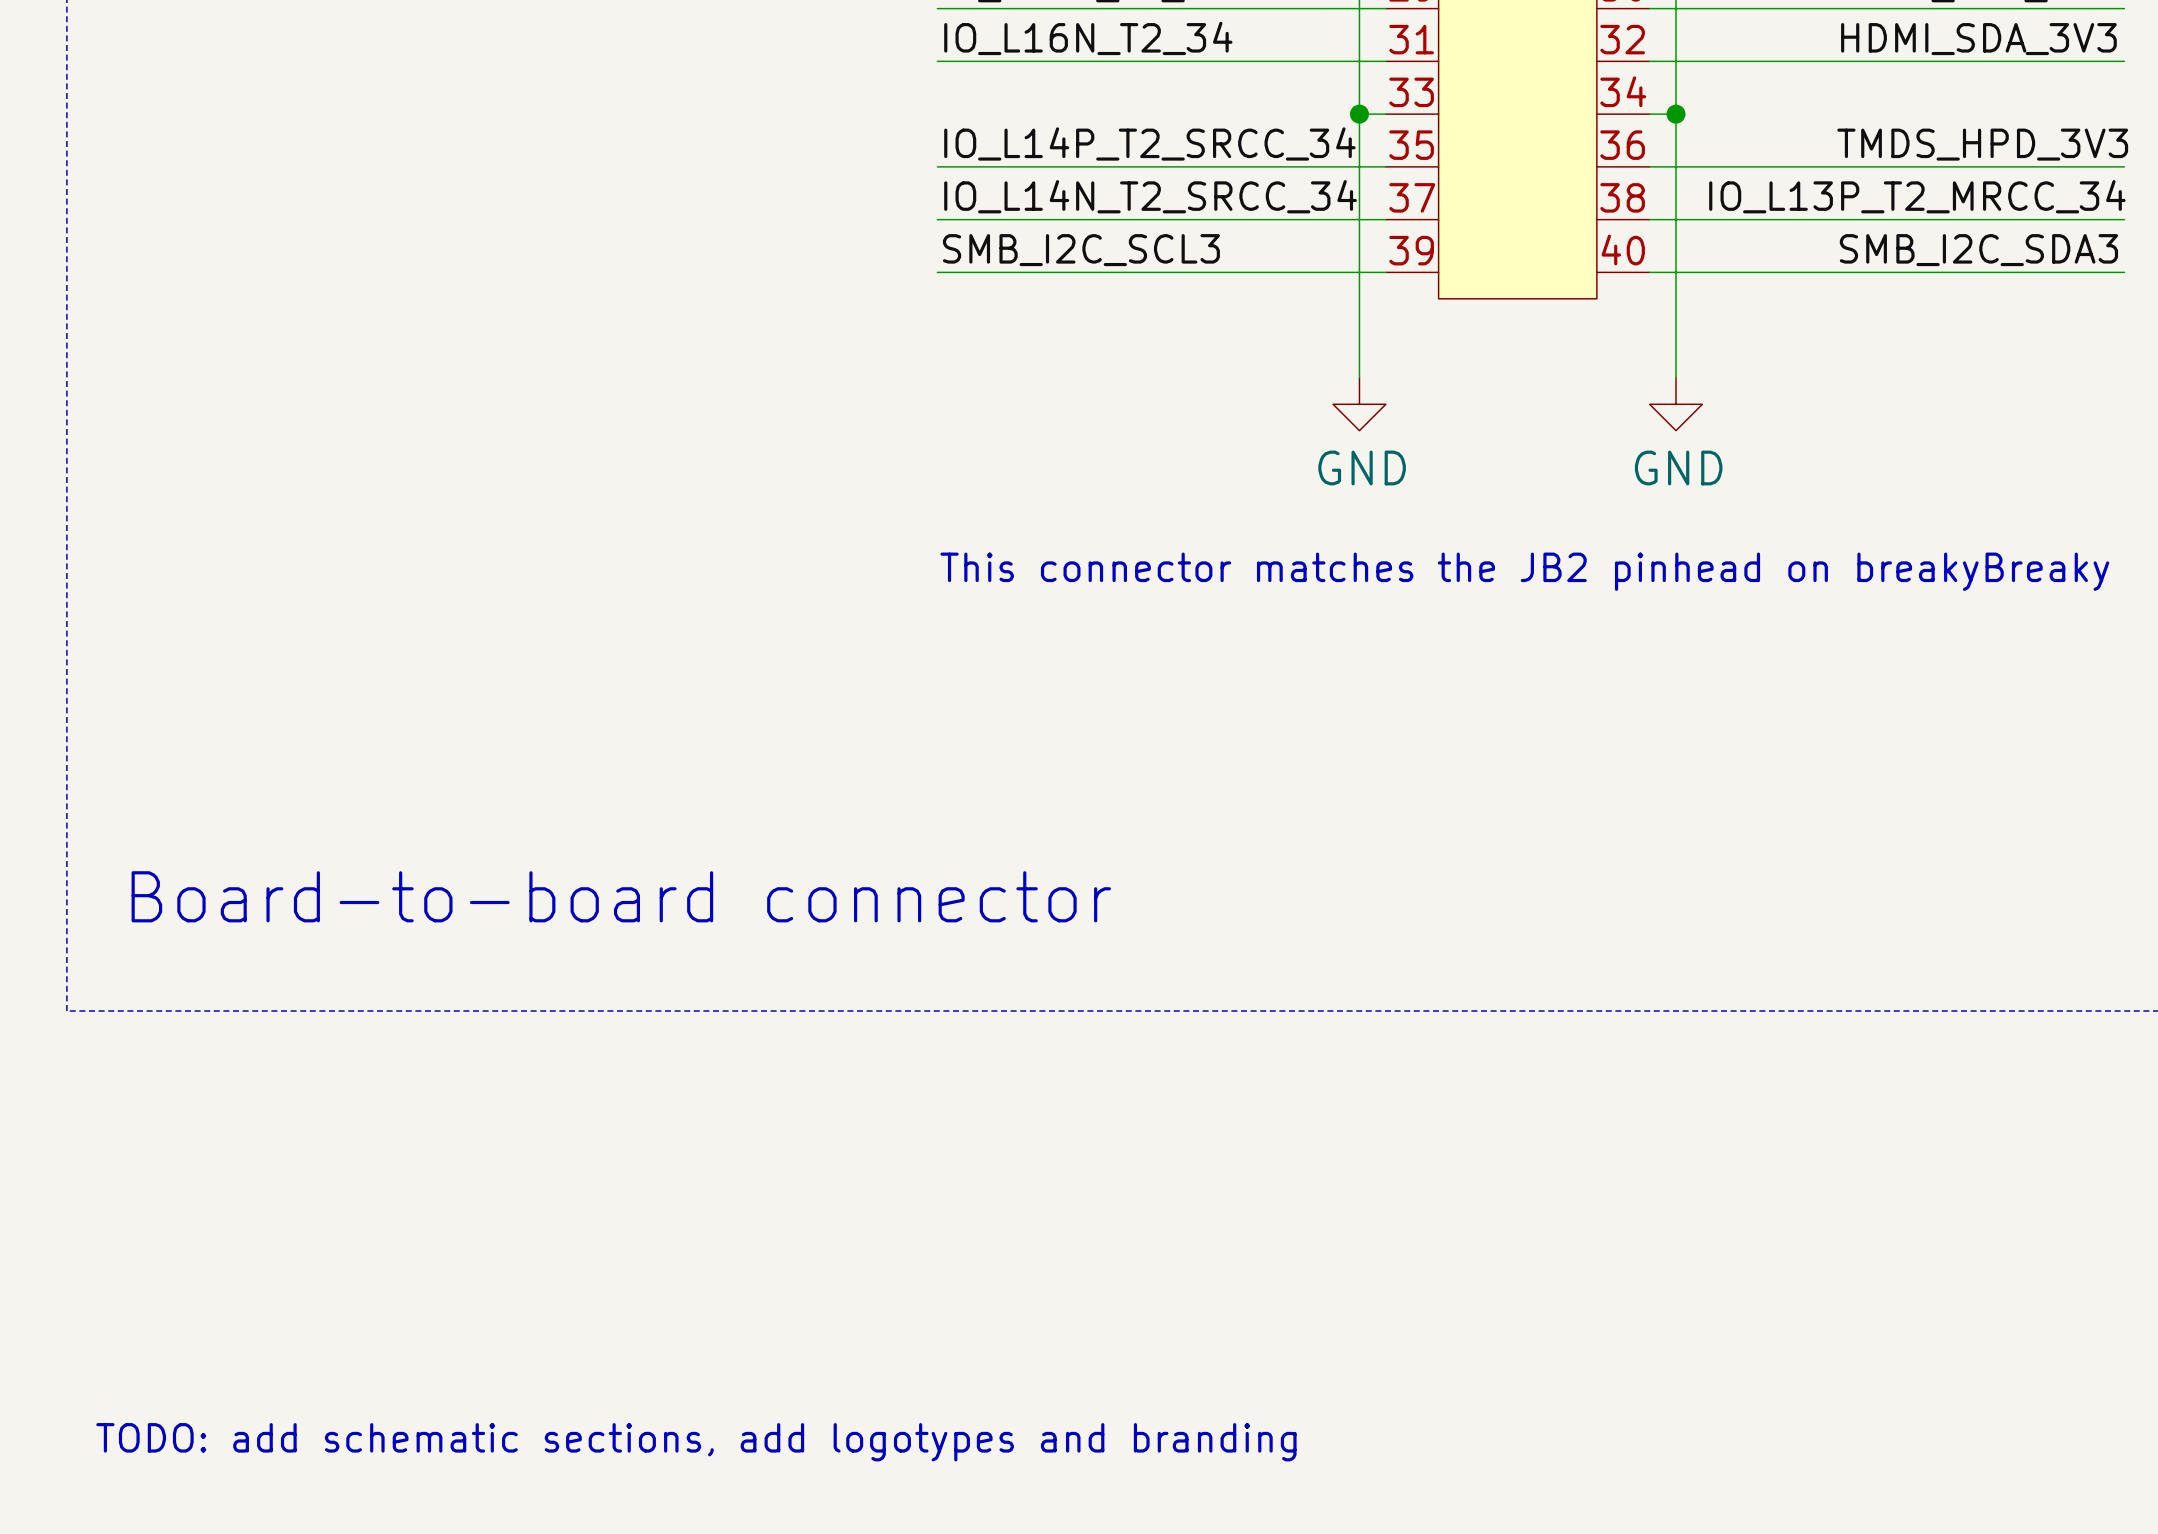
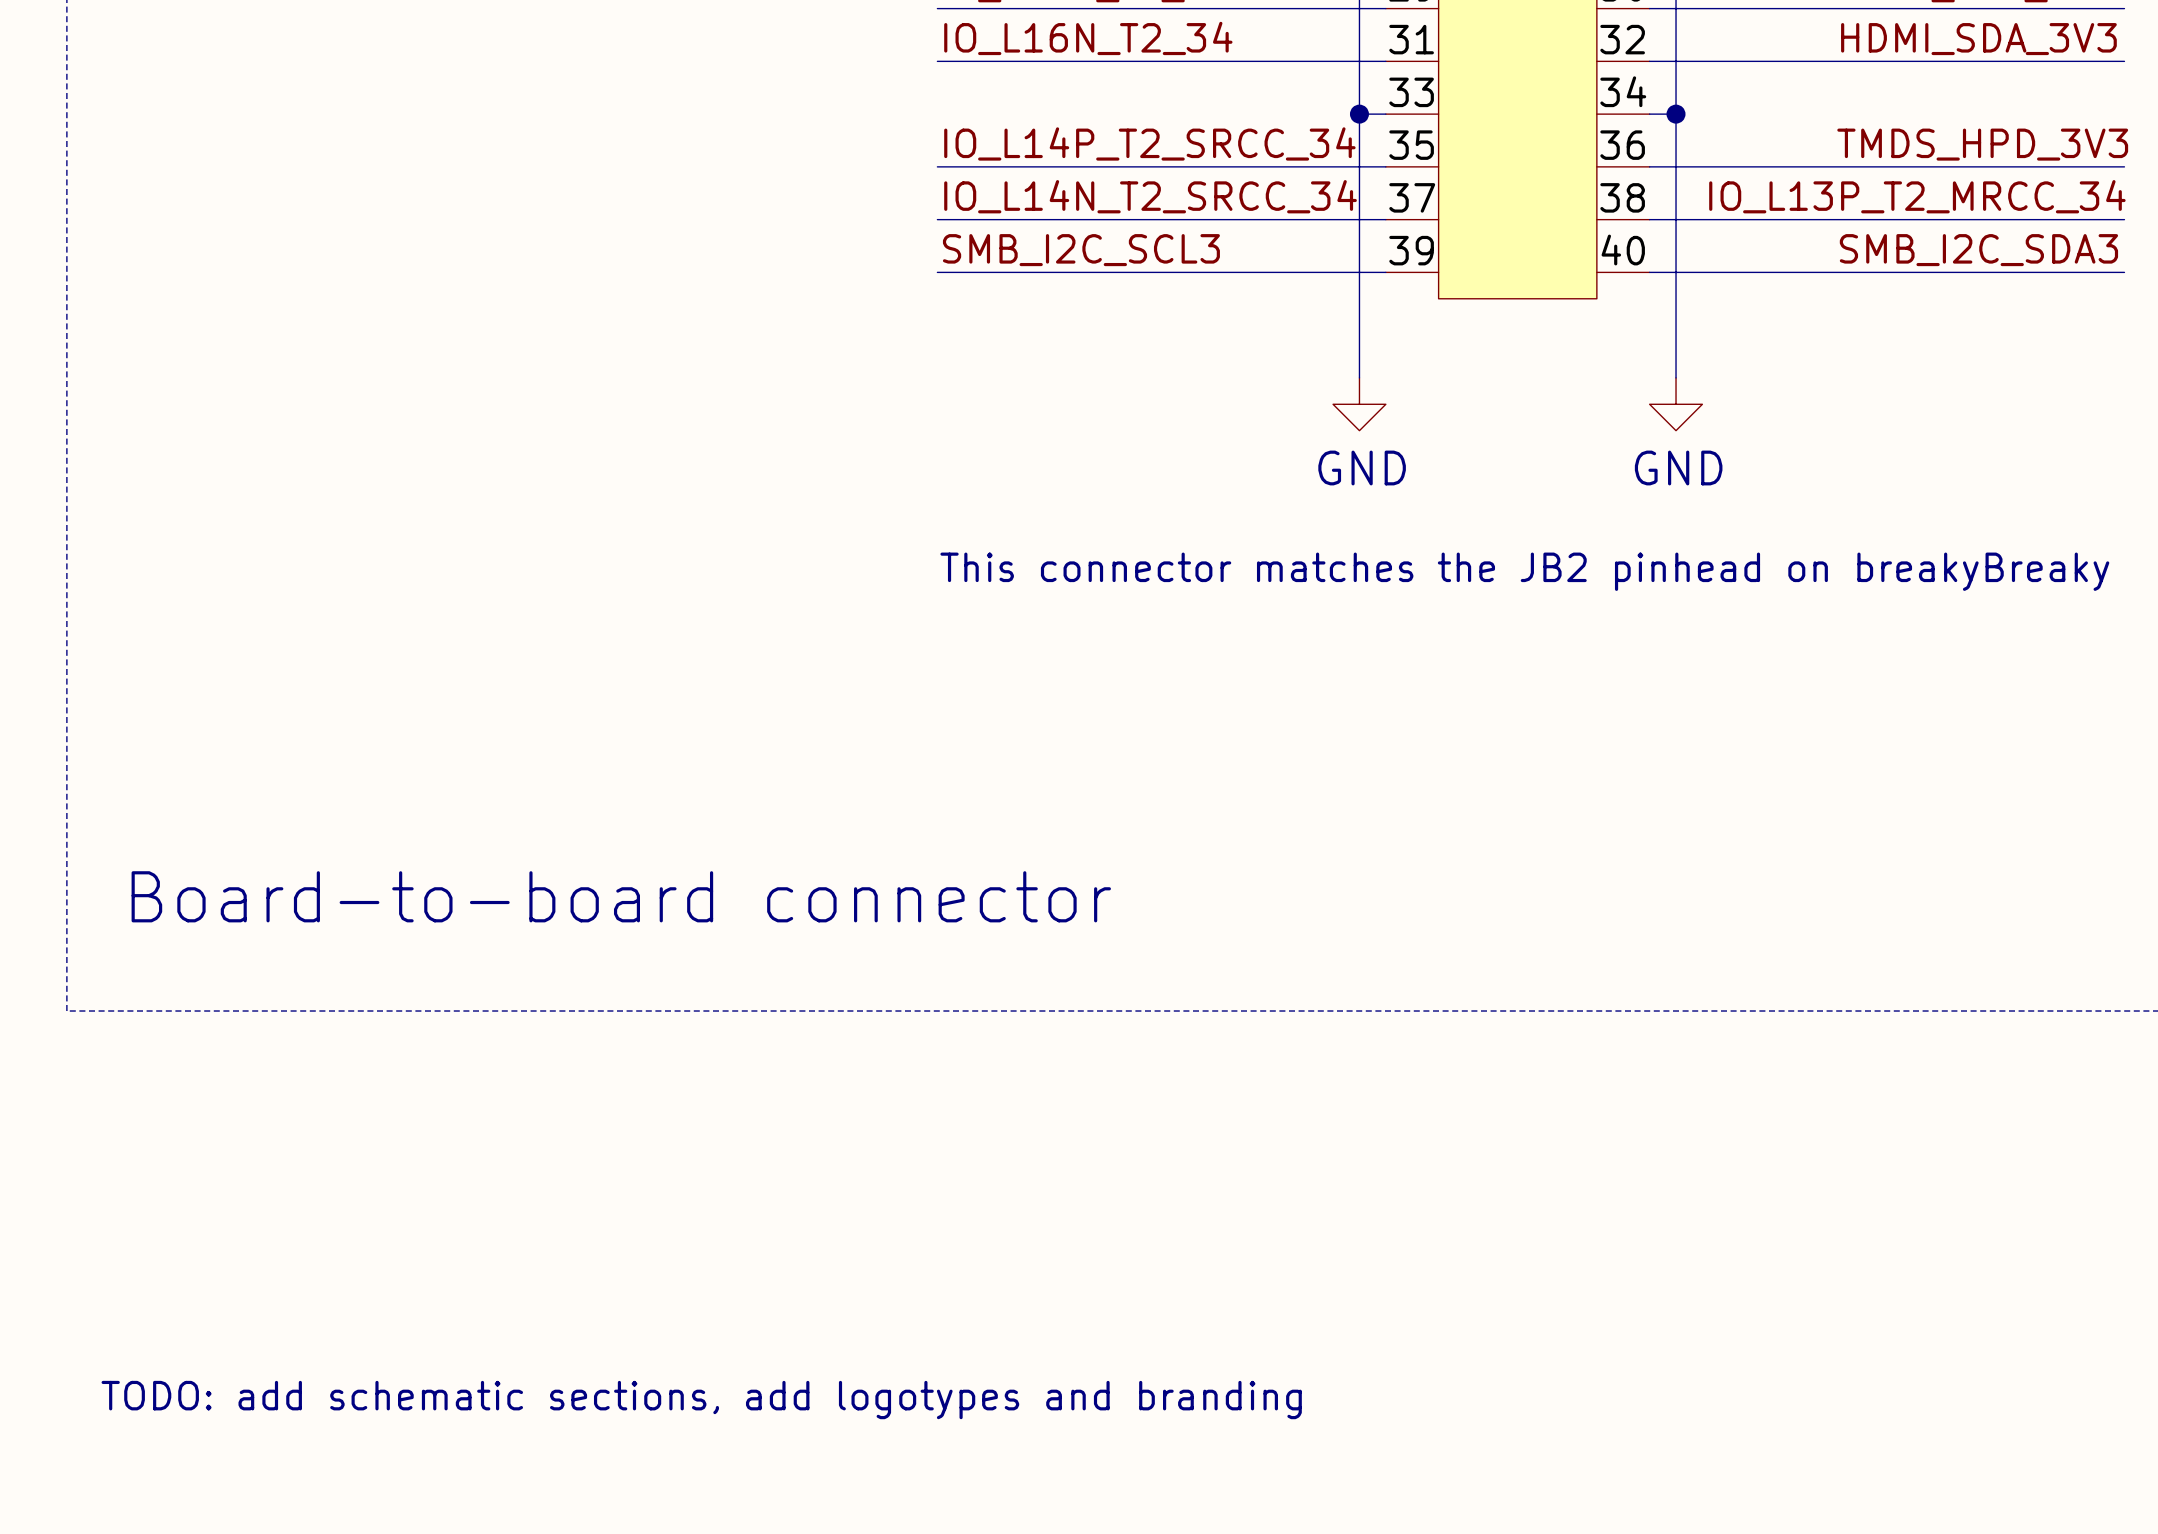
text position: TODO: add schematic sections, add logotypes and branding (696, 1442) -> TODO: add schematic sections, add logotypes and branding (701, 1400)

